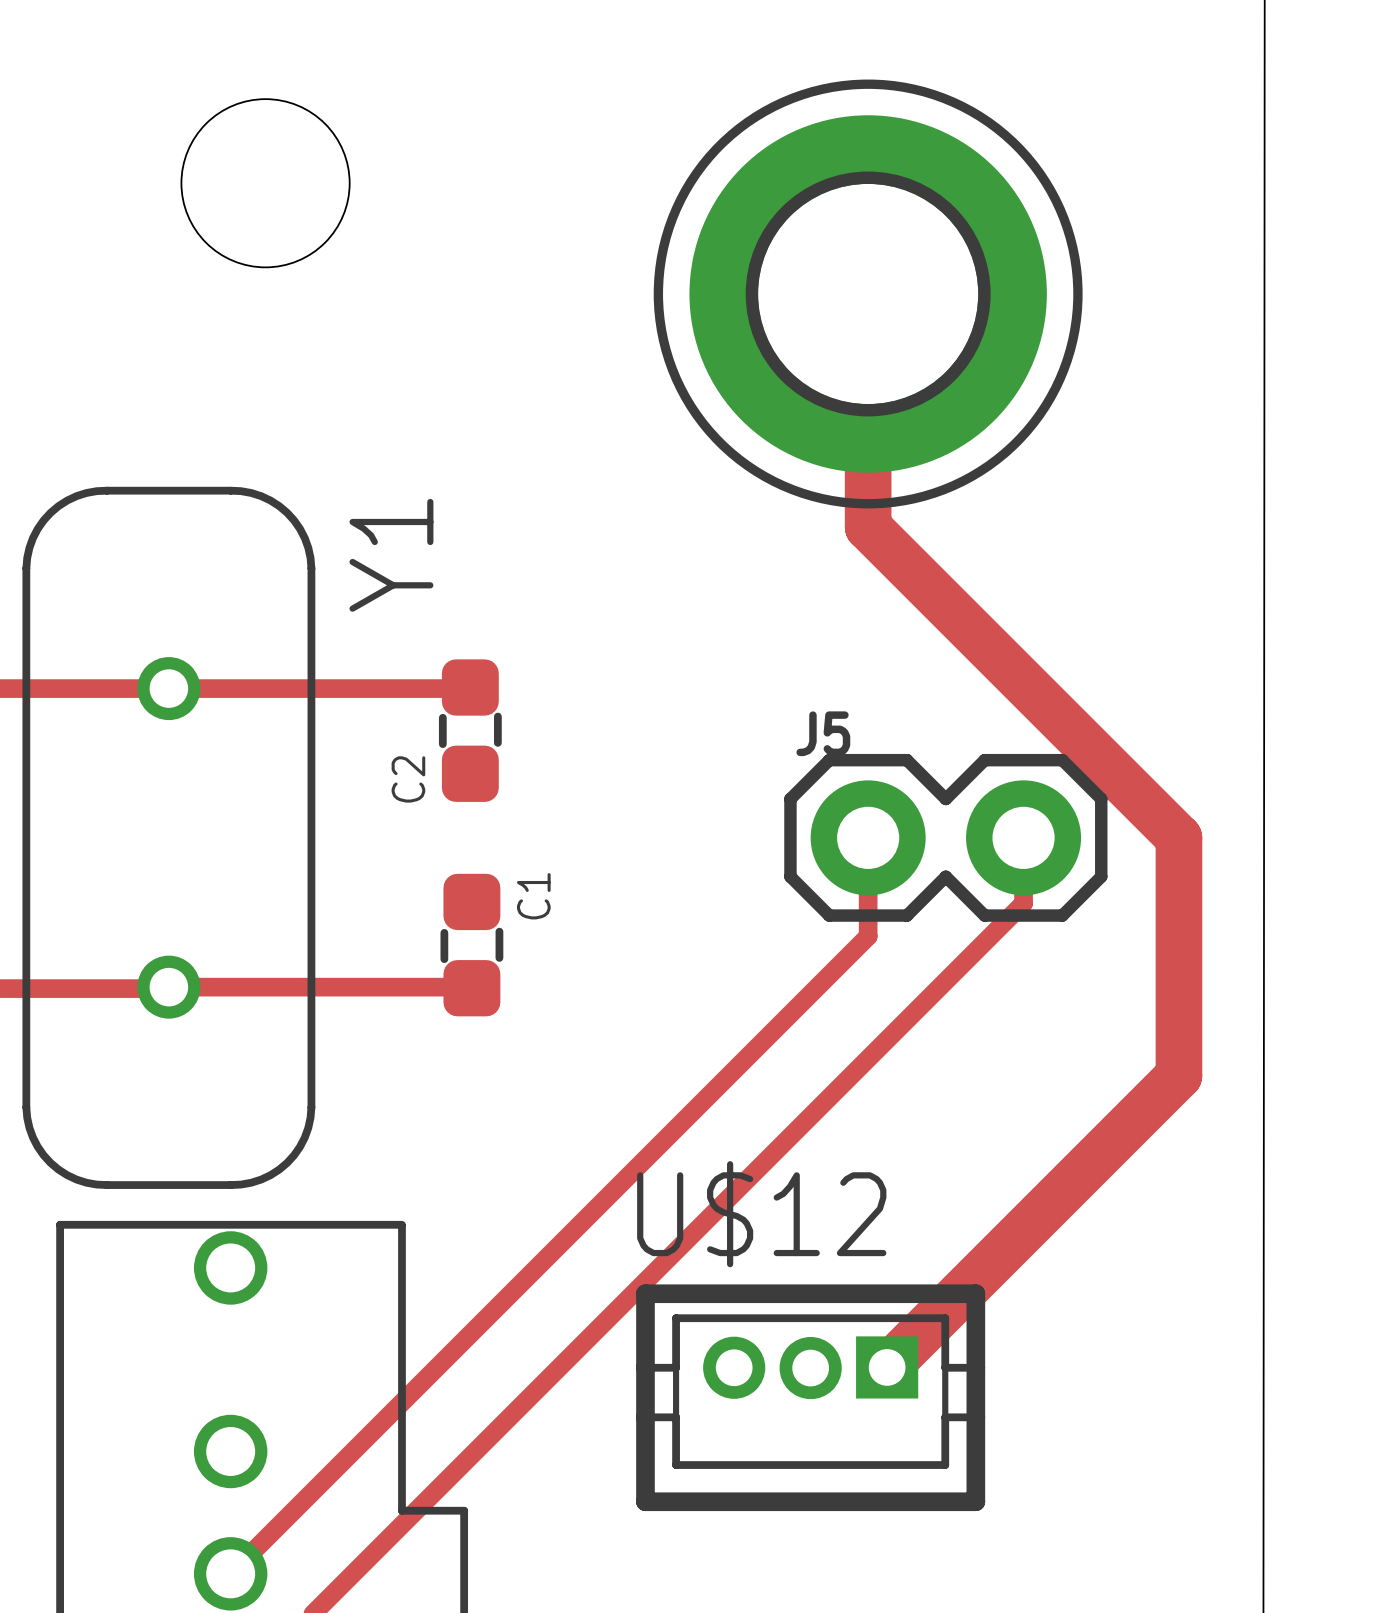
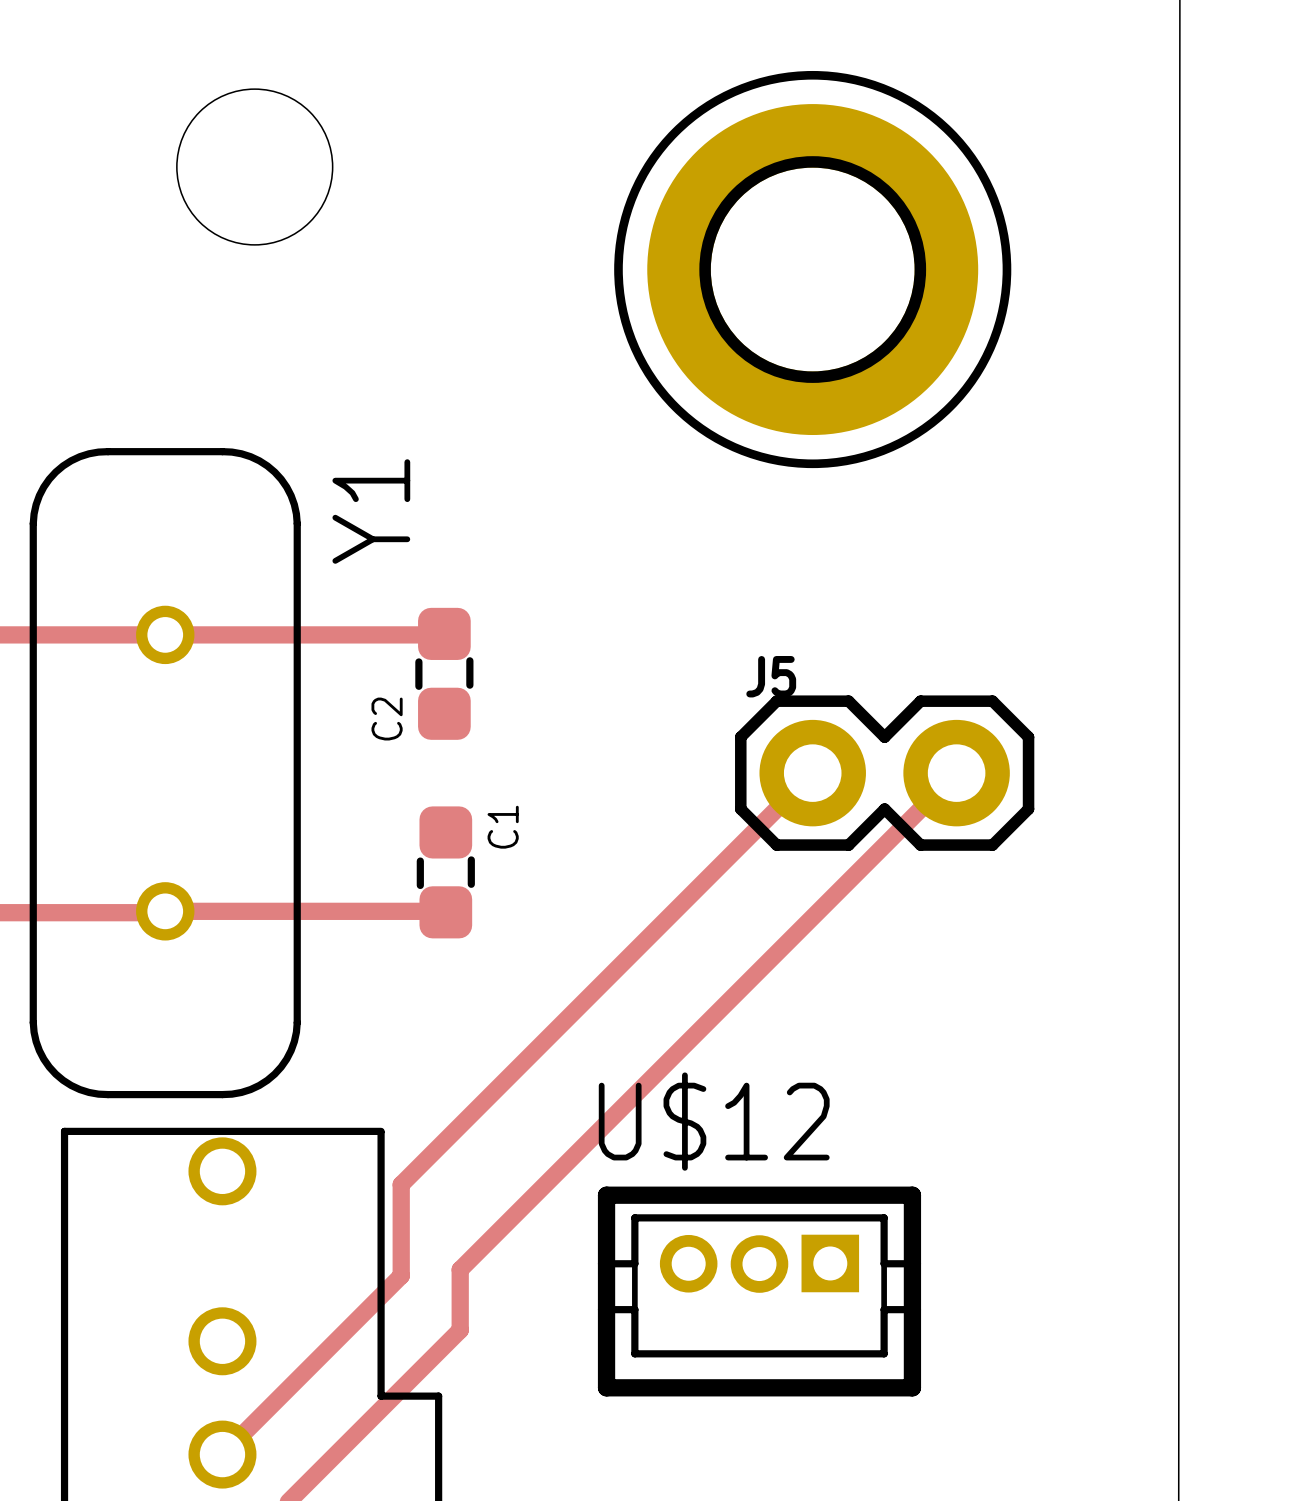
track: (868, 293) (868, 527) (1178, 837) (1178, 1075) (887, 1367) -> none
track: (868, 837) (868, 936) (423, 1380) -> (812, 773) (401, 1184) (401, 1275)
track: (1023, 838) (1023, 903) (487, 1439) -> (956, 773) (460, 1269) (460, 1330)

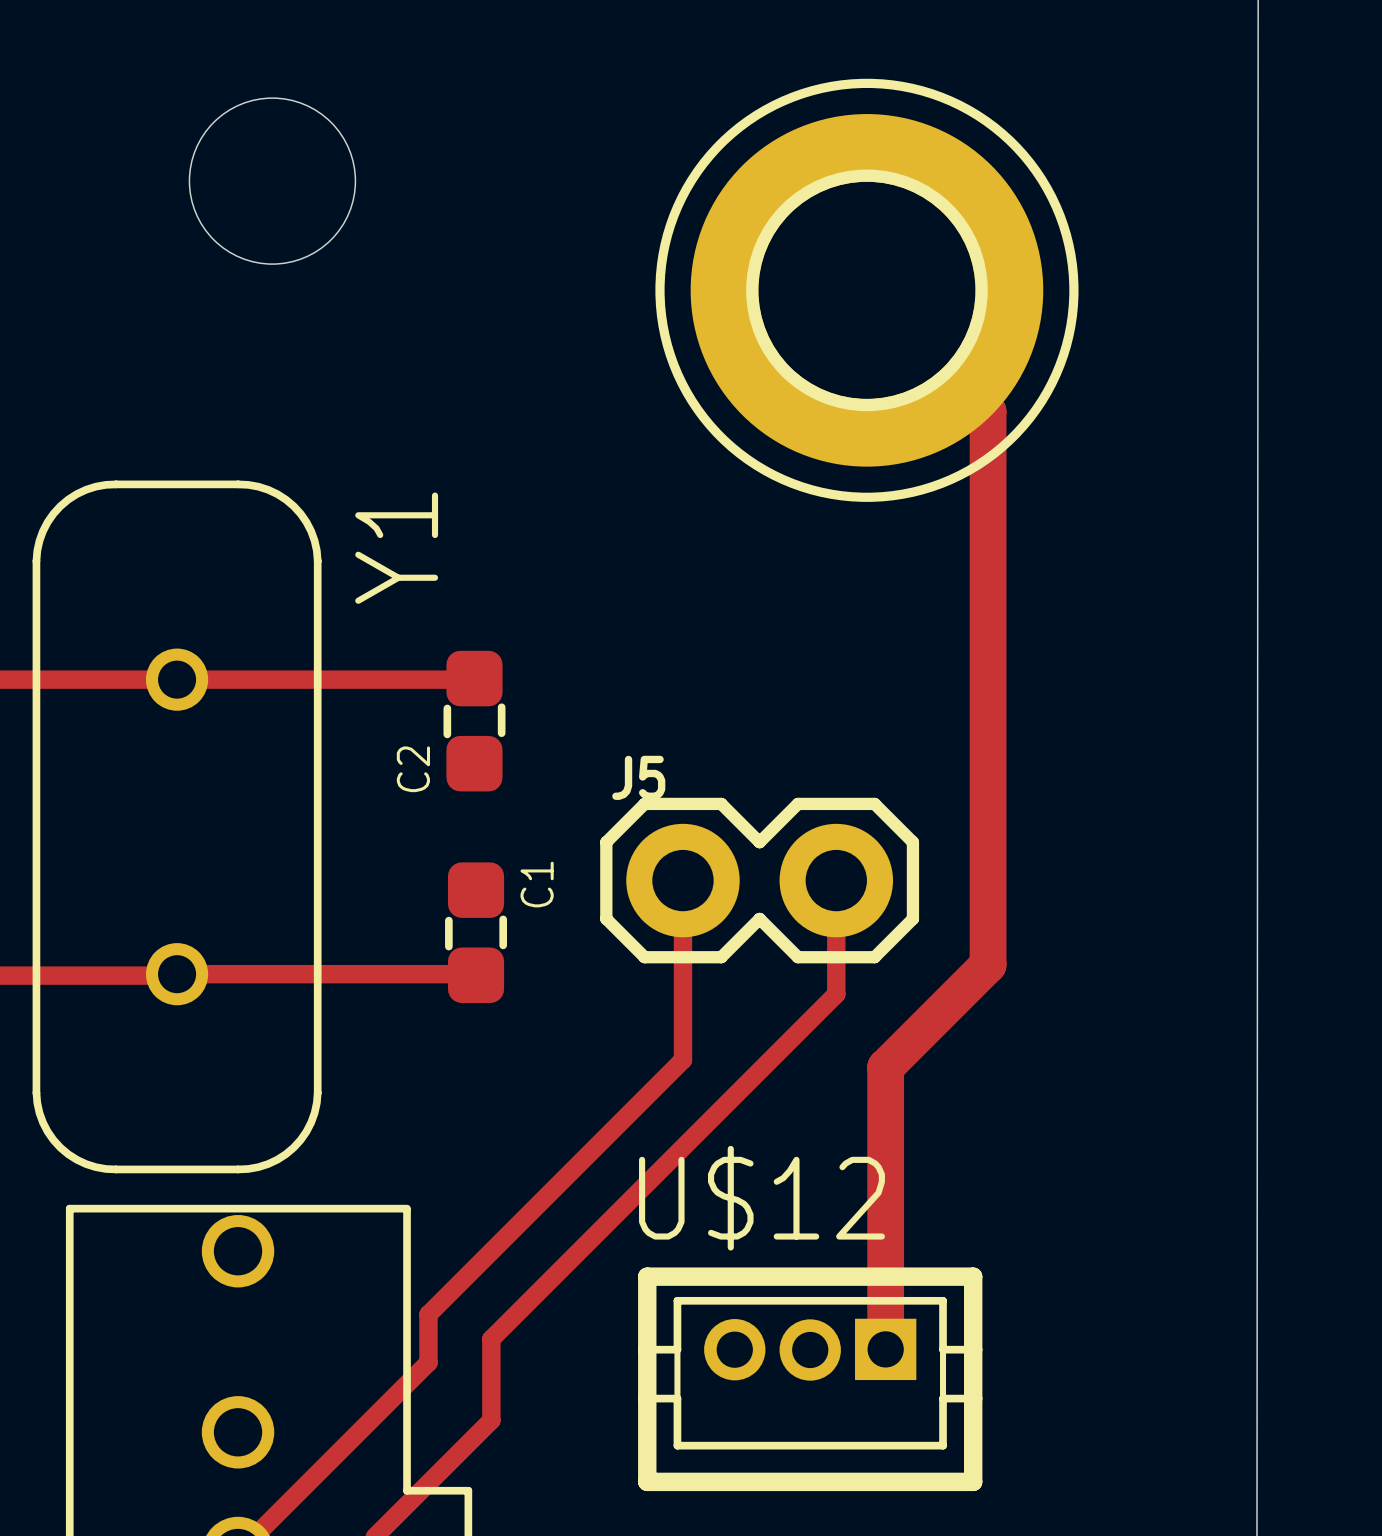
track: none -> (866, 290) (988, 411) (988, 964) (885, 1067) (885, 1349)
track: (812, 773) (401, 1184) (401, 1230) -> (682, 880) (682, 1059) (428, 1314)
J5 position: (884, 773) -> (759, 880)
track: (956, 773) (460, 1269) -> (836, 880) (836, 994) (491, 1339) (491, 1356)

